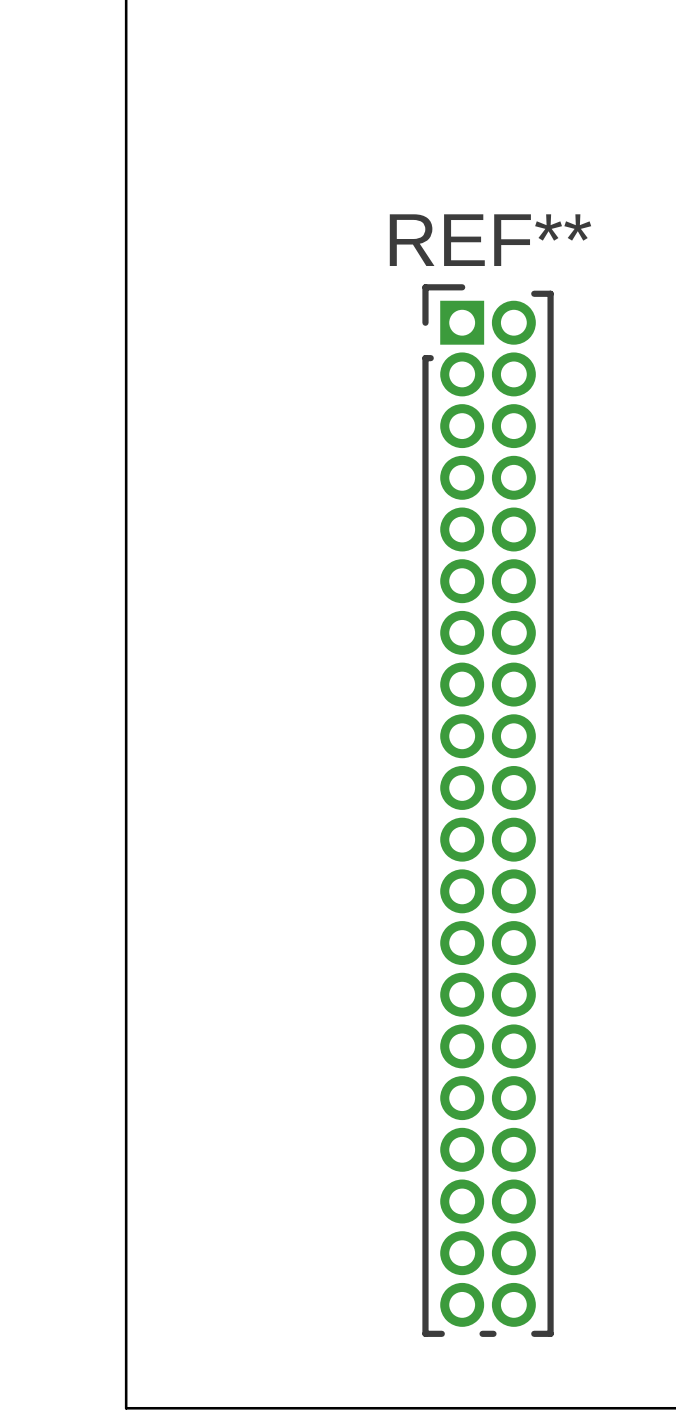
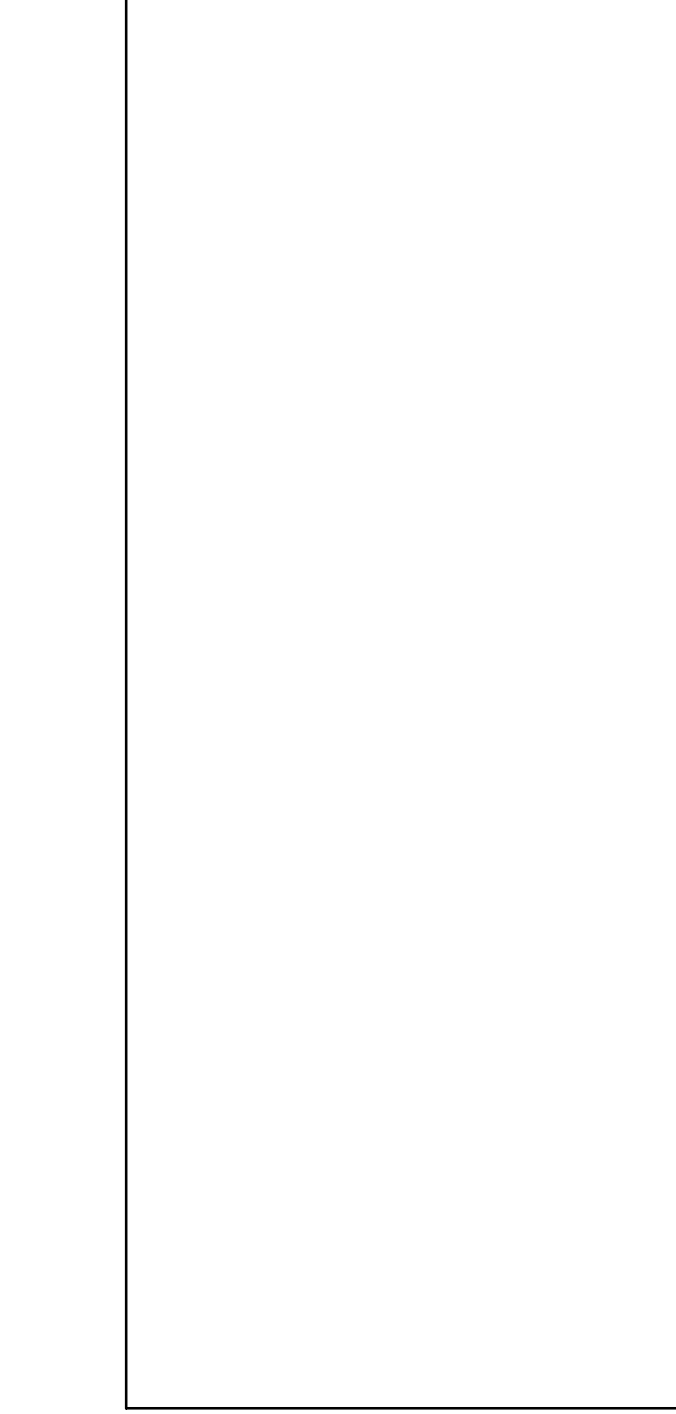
REF**: (488, 810) -> none

